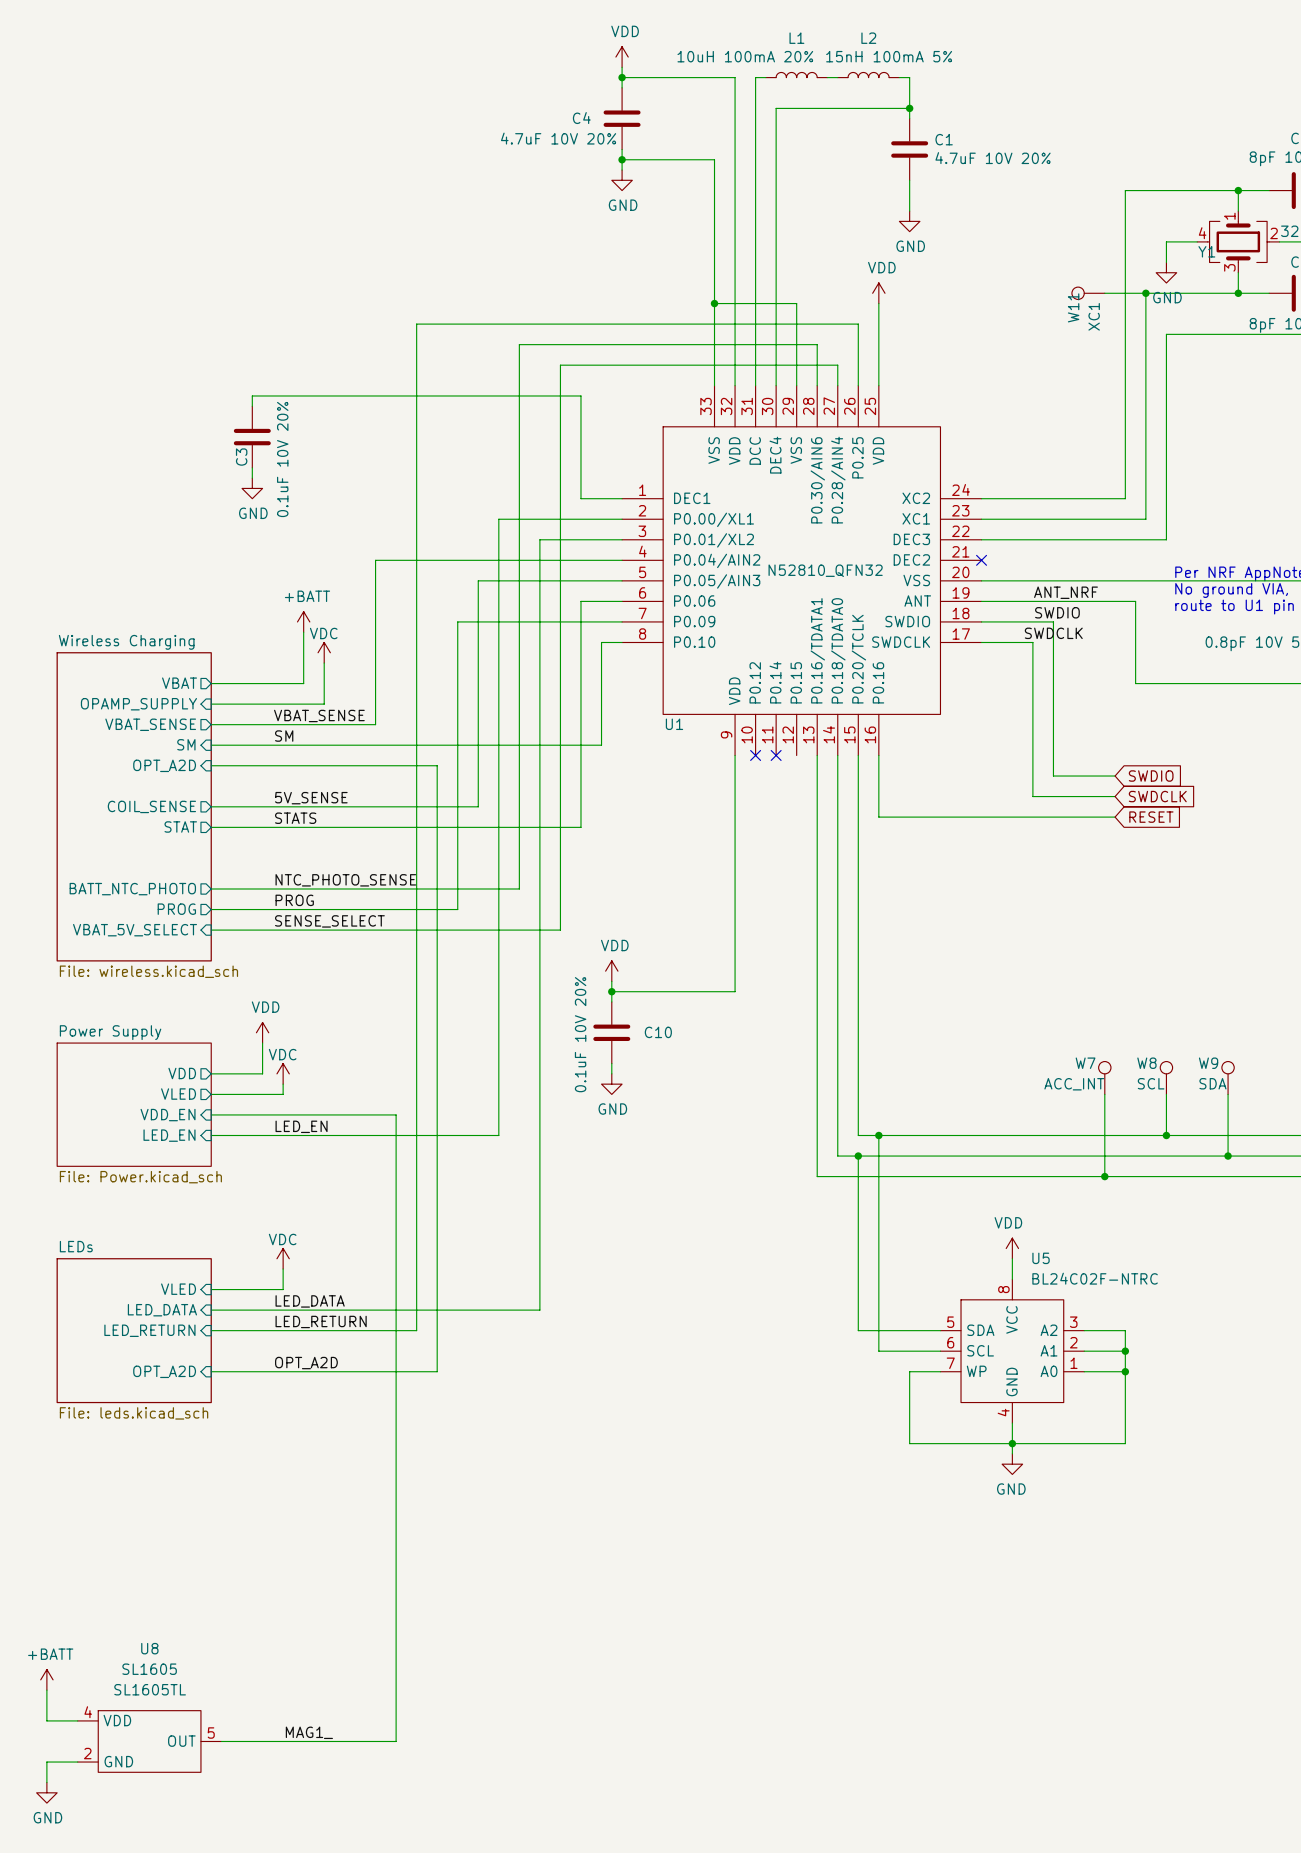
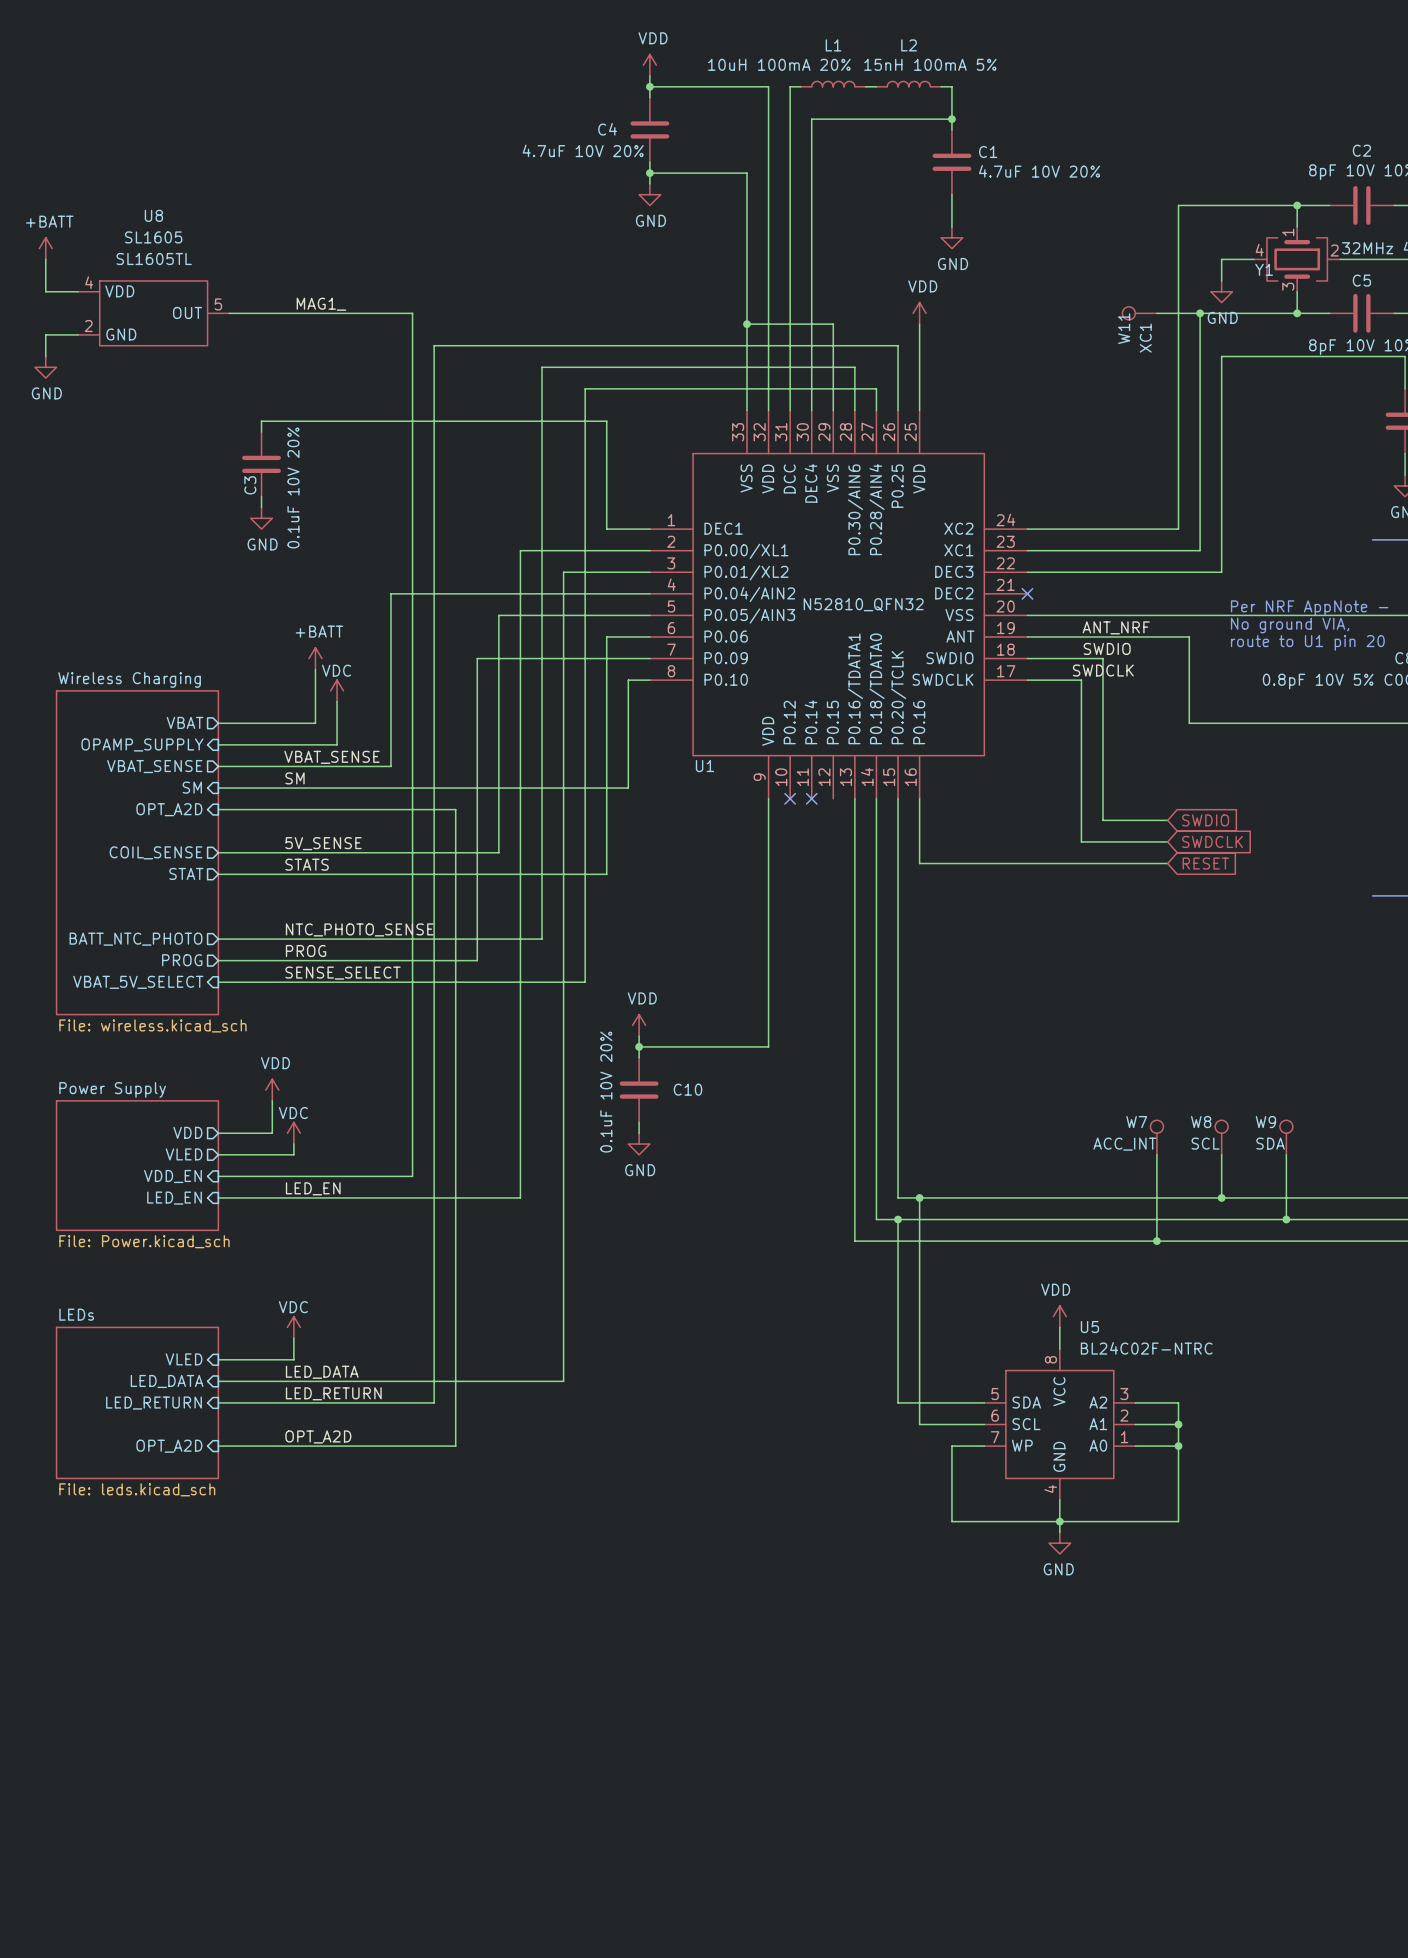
power symbol: none -> +BATT (45, 248)
wire: none -> (45, 259) (45, 291) (78, 291)
label: none -> MAG1_ (321, 304)
wire: none -> (78, 334) (45, 334) (45, 356)
power symbol: none -> GND (45, 367)
wire: (396, 1114) (396, 1741) (221, 1741) -> (412, 1176) (412, 313) (229, 313)
power symbol: +BATT (46, 1679) -> none
wire: (46, 1690) (46, 1720) (77, 1720) -> none
label: MAG1_ (309, 1732) -> none
U8 position: (149, 1741) -> (153, 313)
wire: (77, 1762) (46, 1762) (46, 1782) -> none
power symbol: GND (46, 1792) -> none

